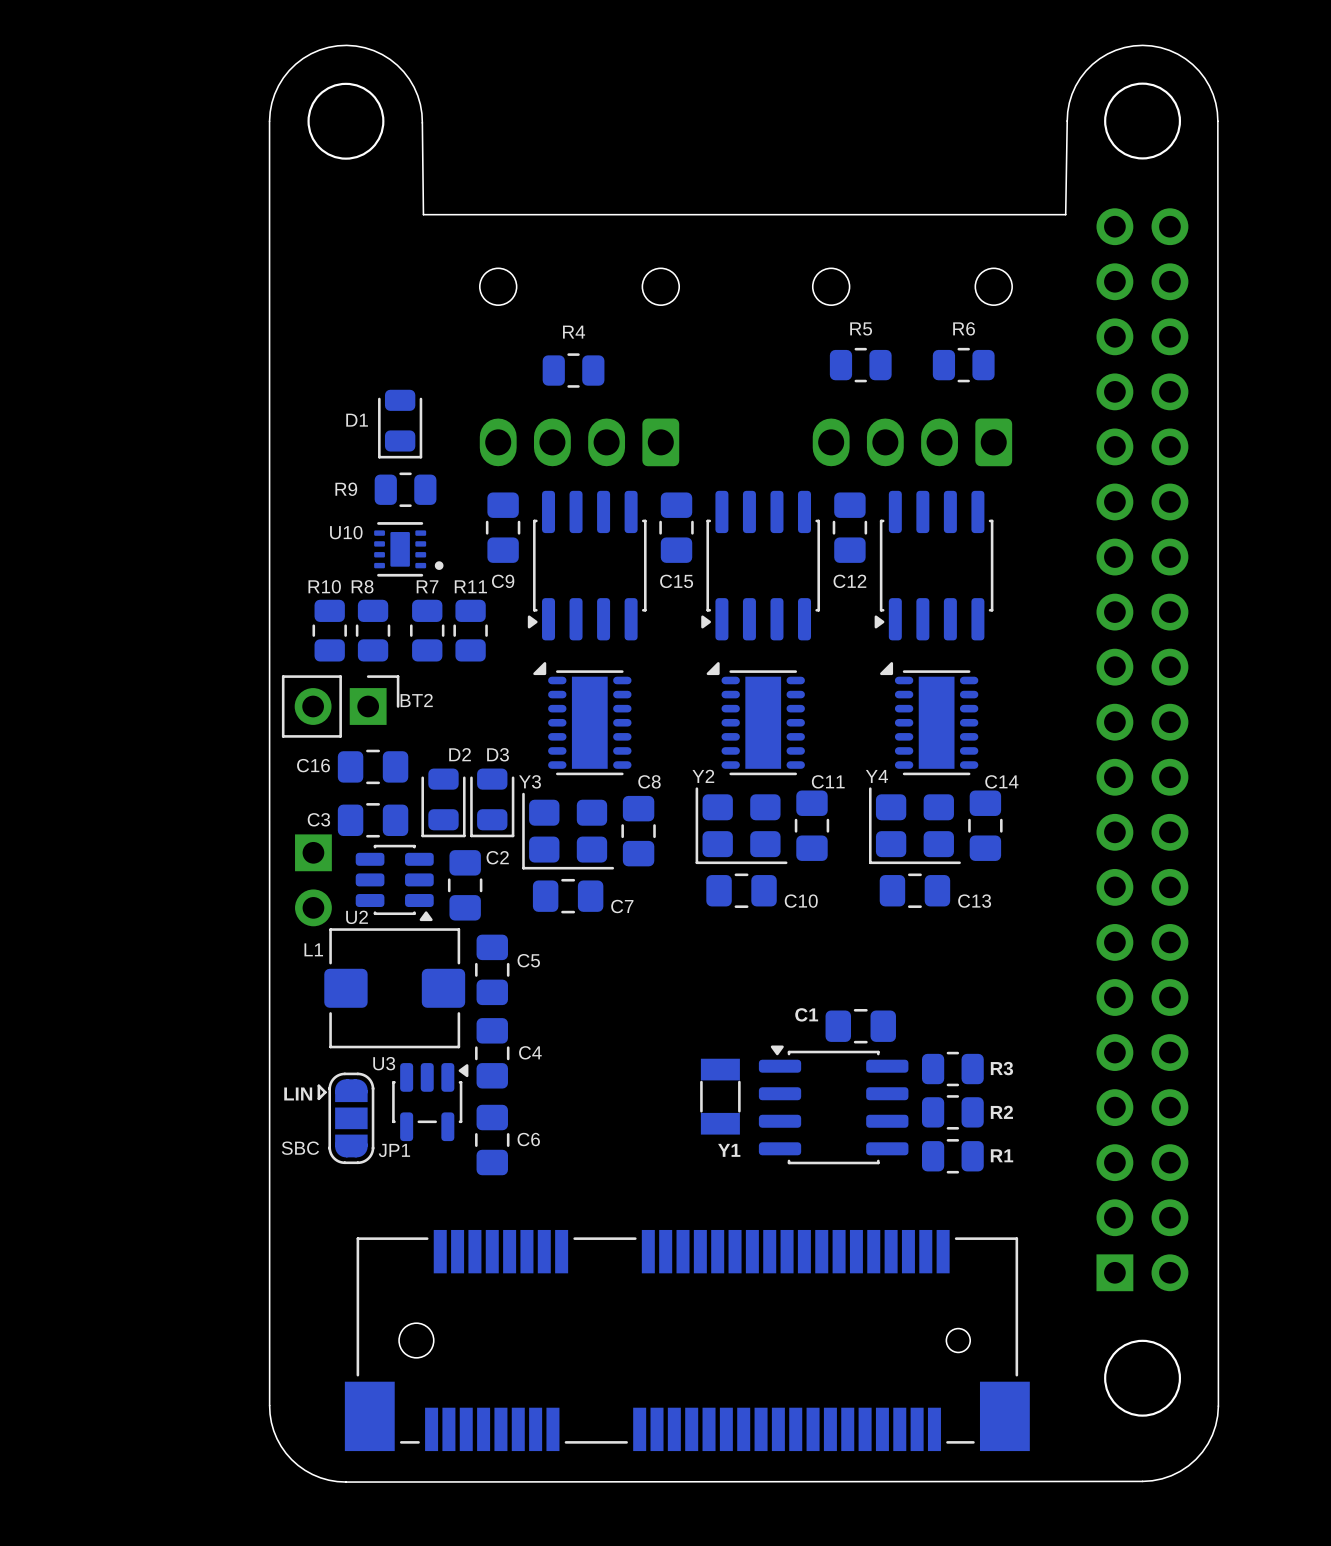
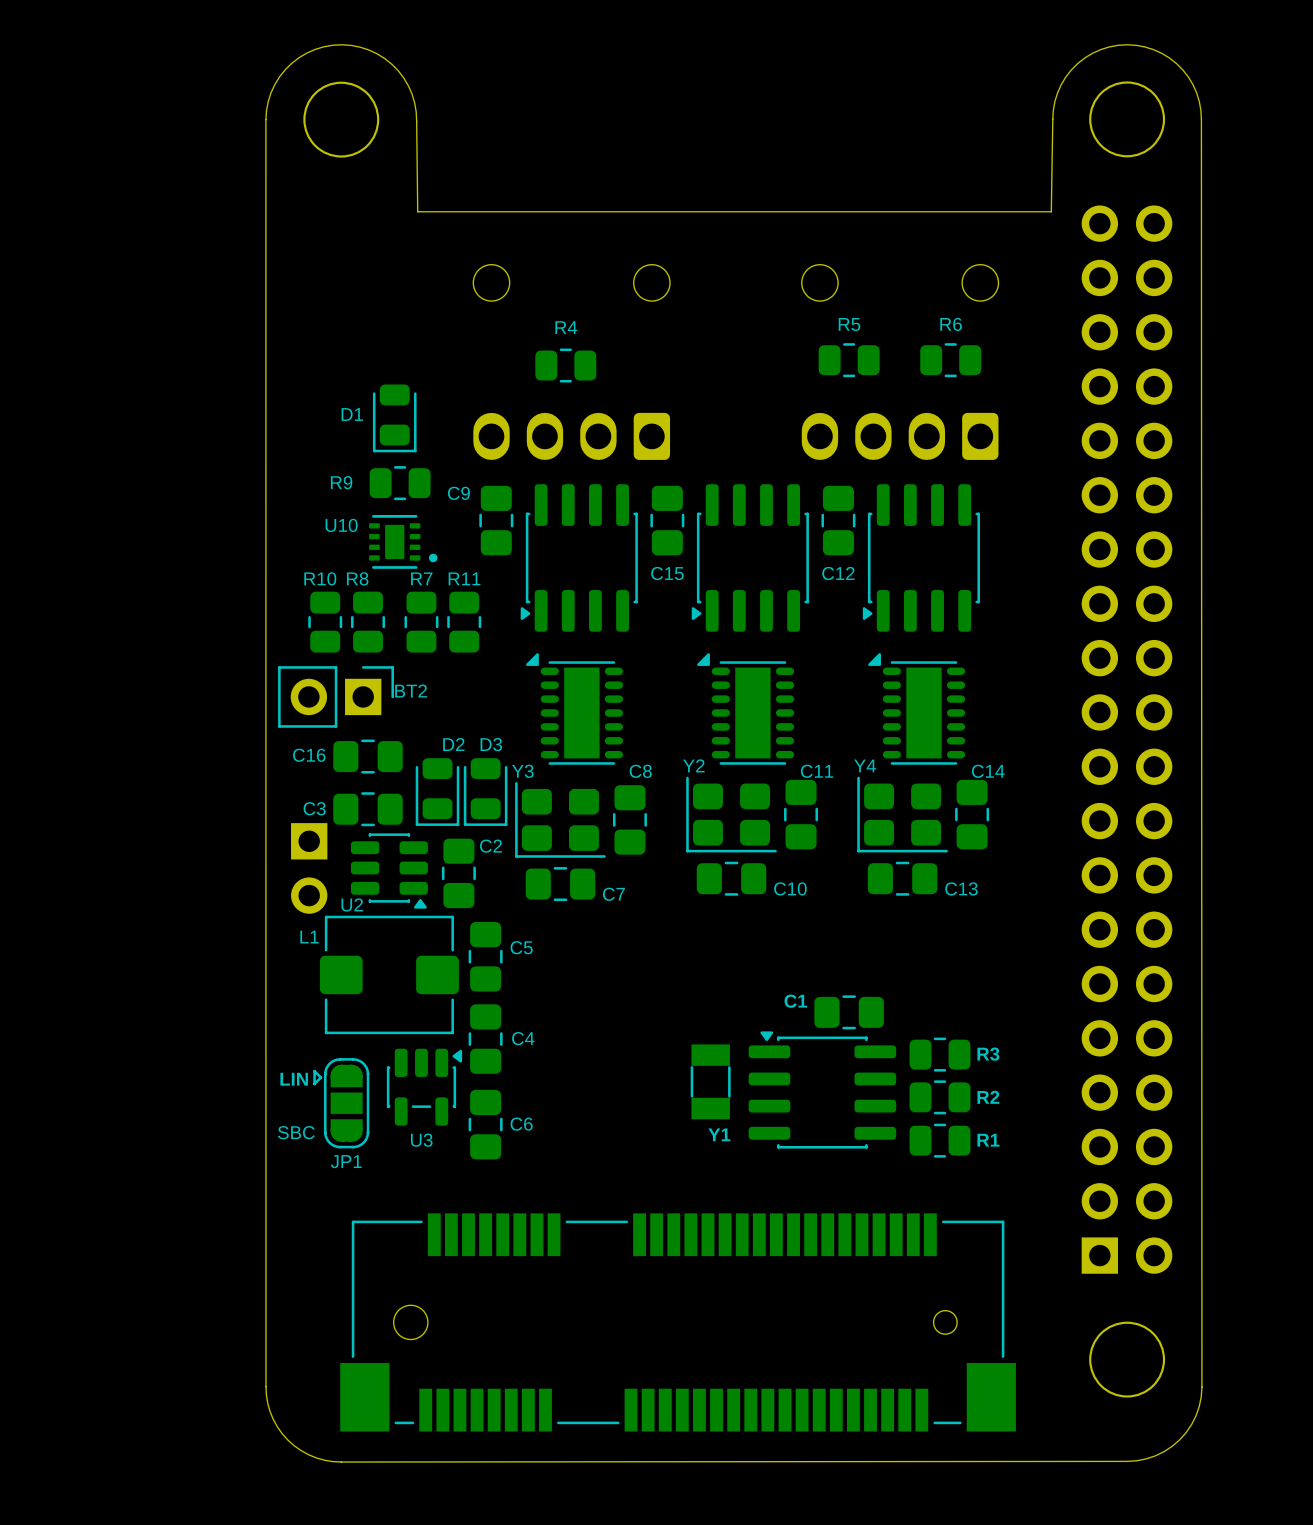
C9 name position: C9 (503, 581) -> C9 (458, 493)
U3 name position: U3 (384, 1063) -> U3 (421, 1140)
JP1 name position: JP1 (394, 1150) -> JP1 (346, 1161)

